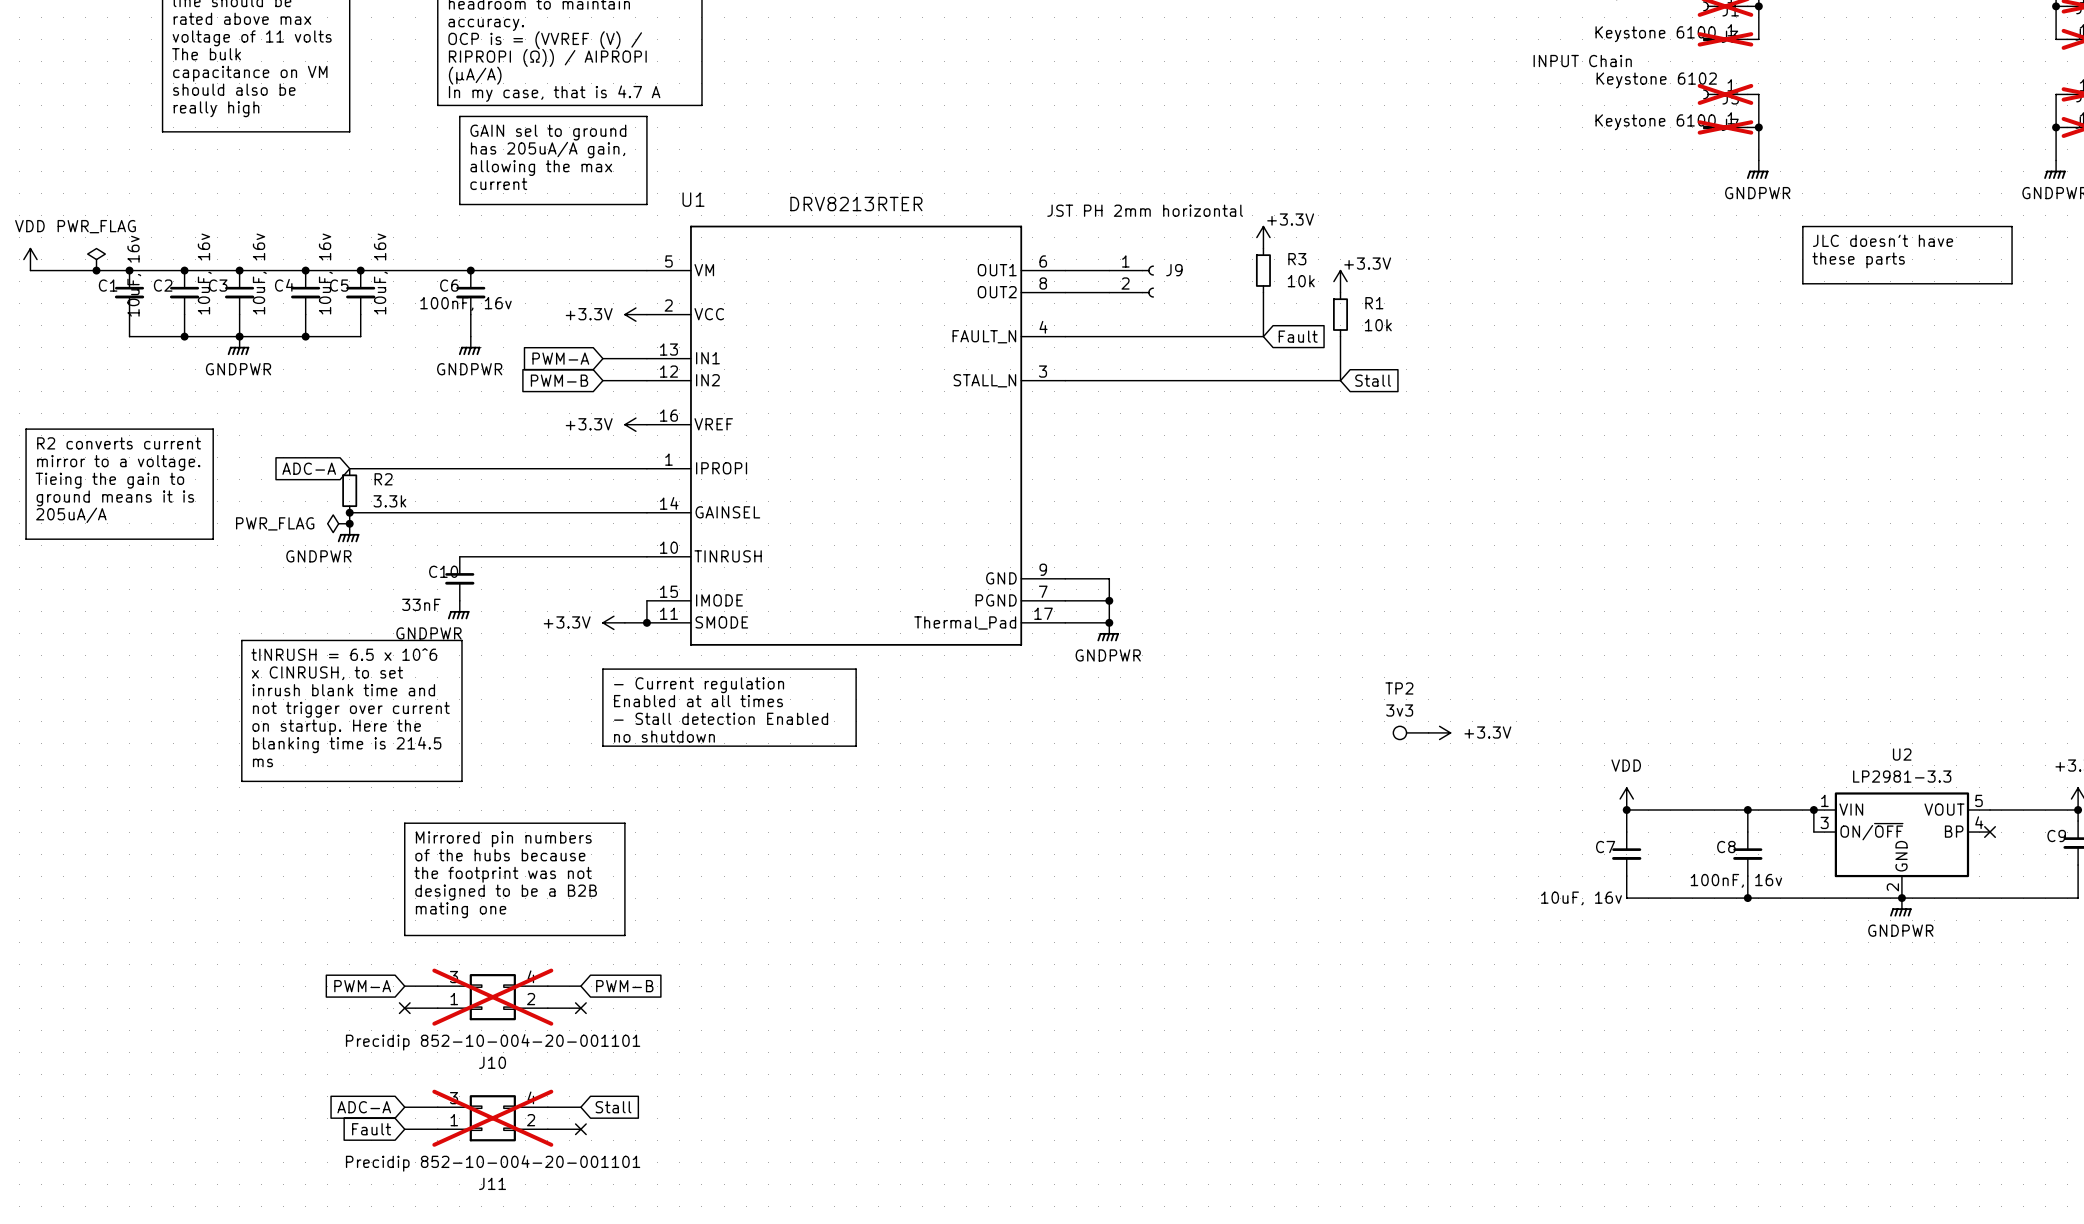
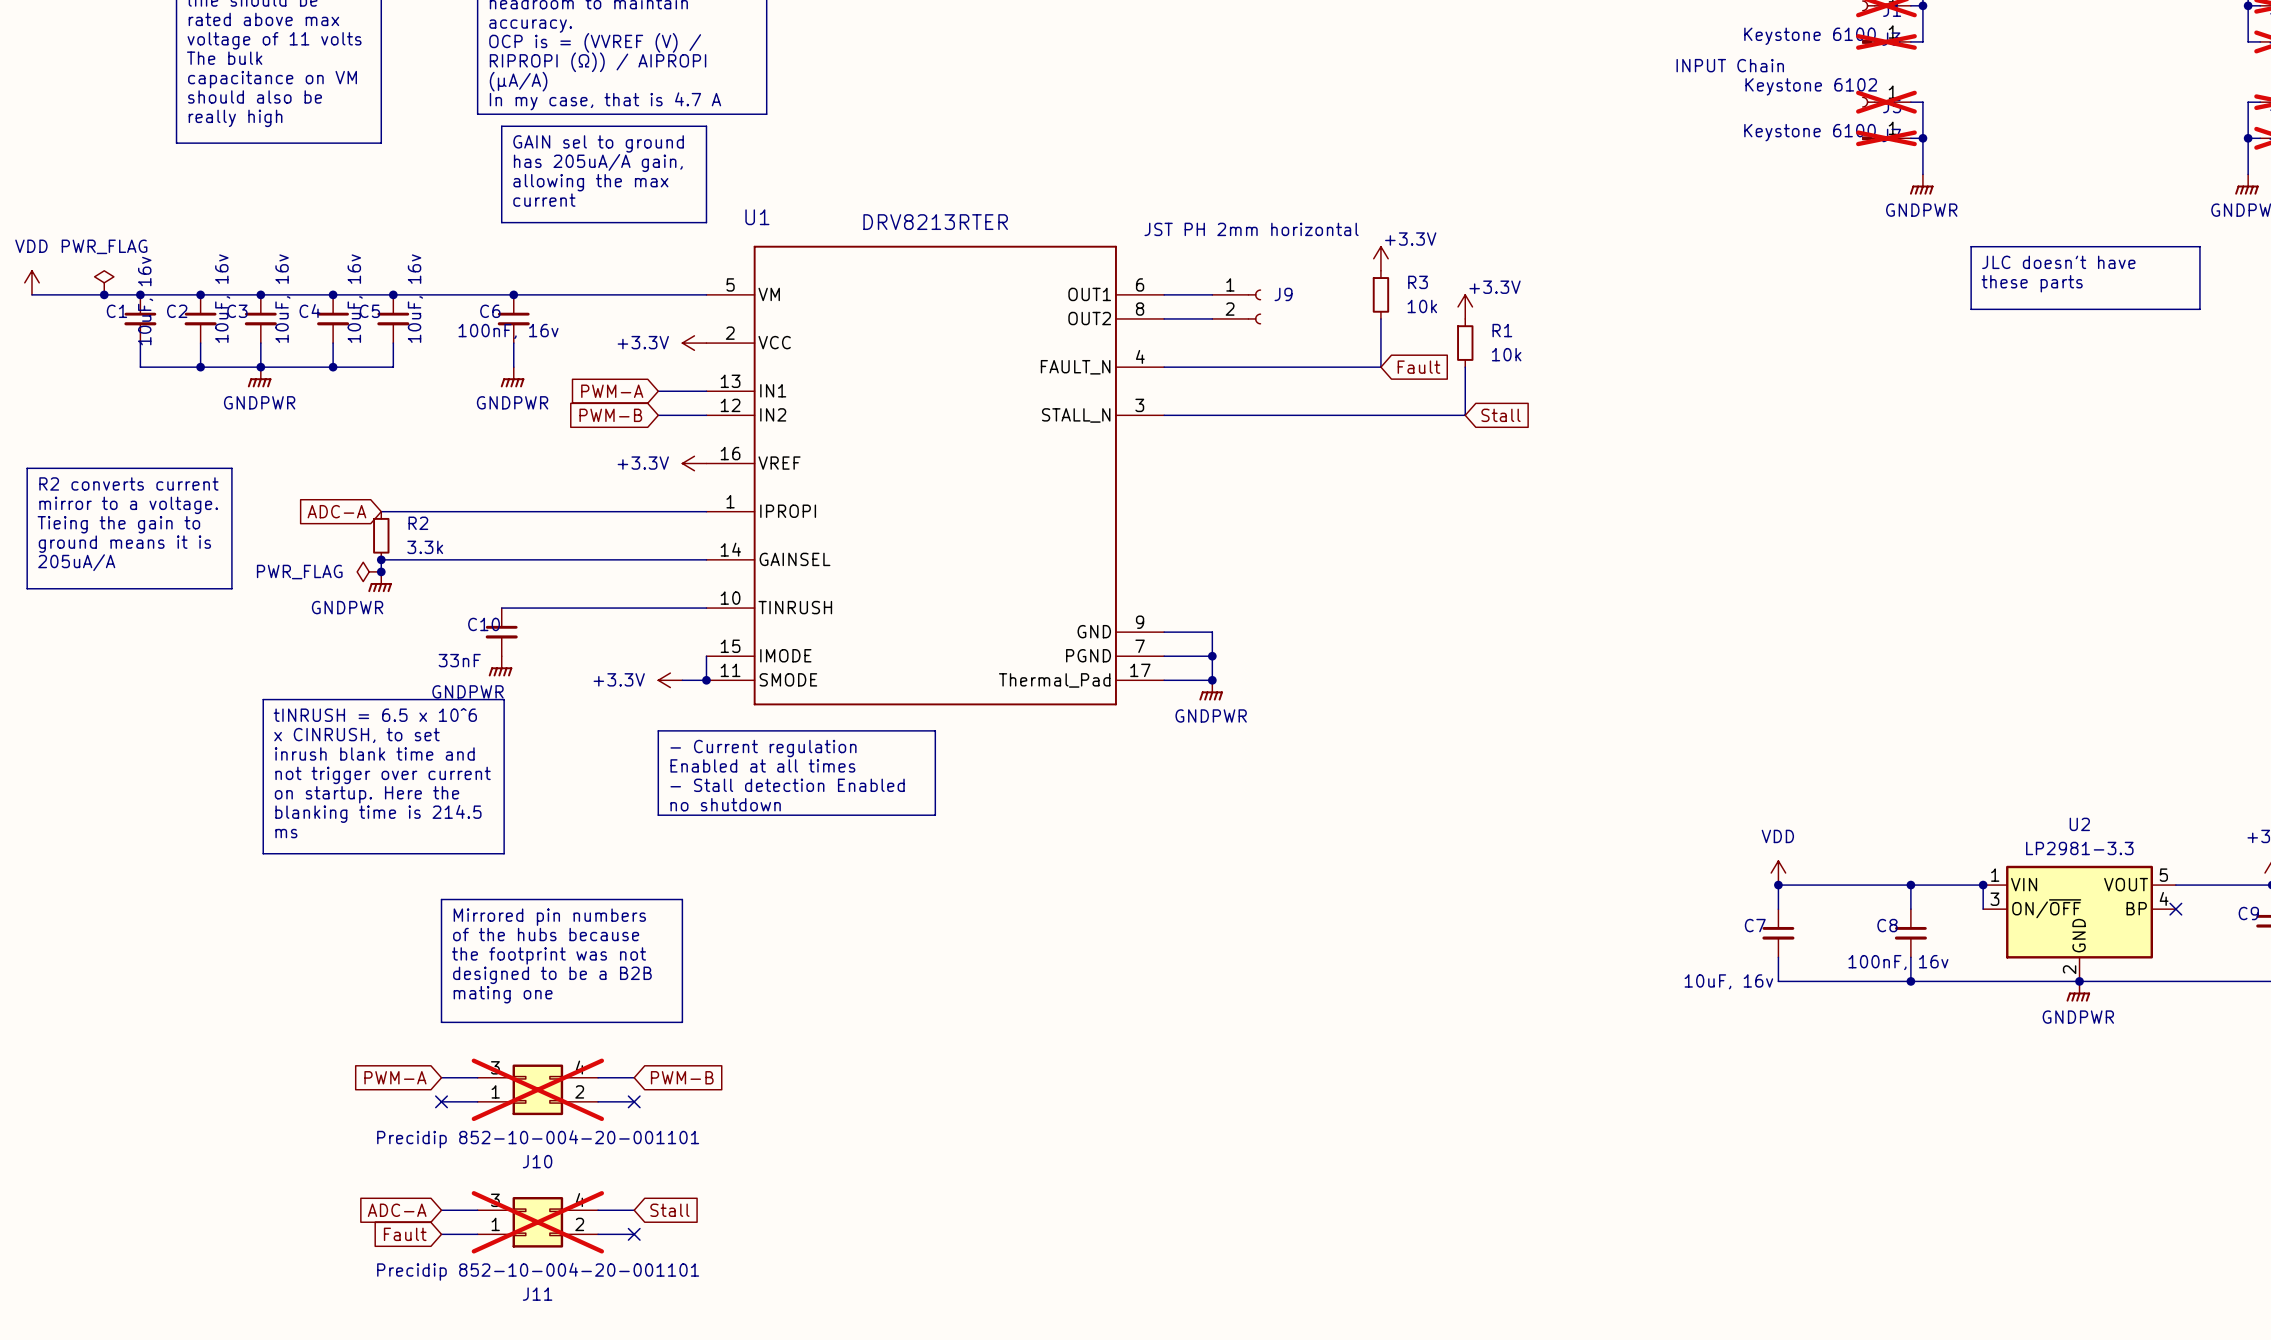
TP2: 3v3 (1410, 732) -> none
power symbol: +3.3V (1439, 732) -> none

